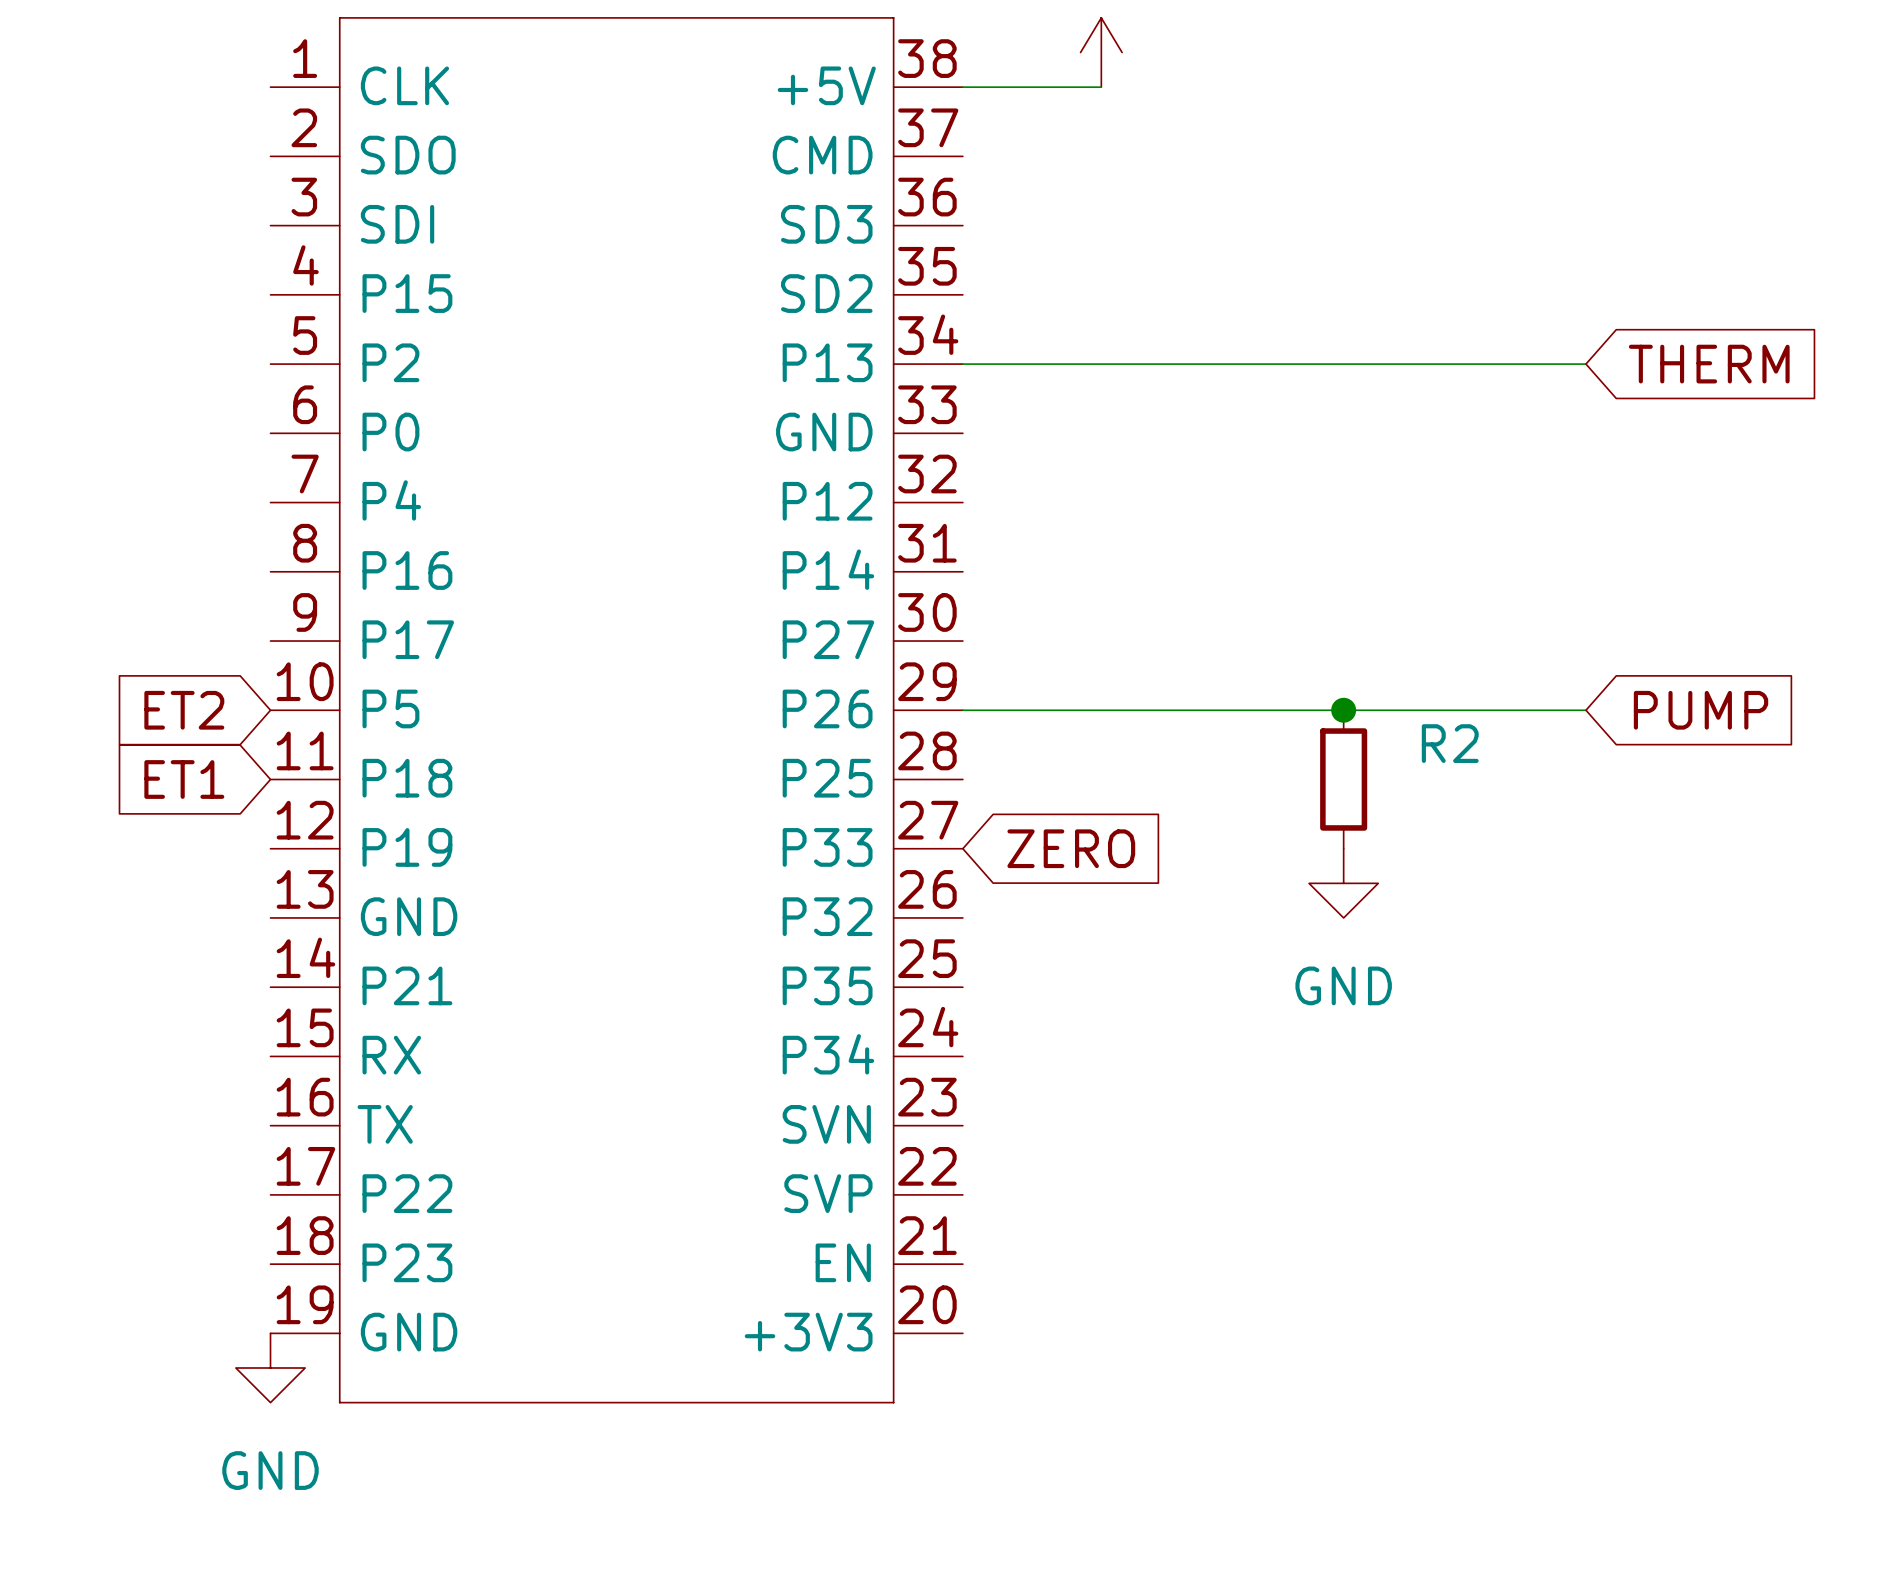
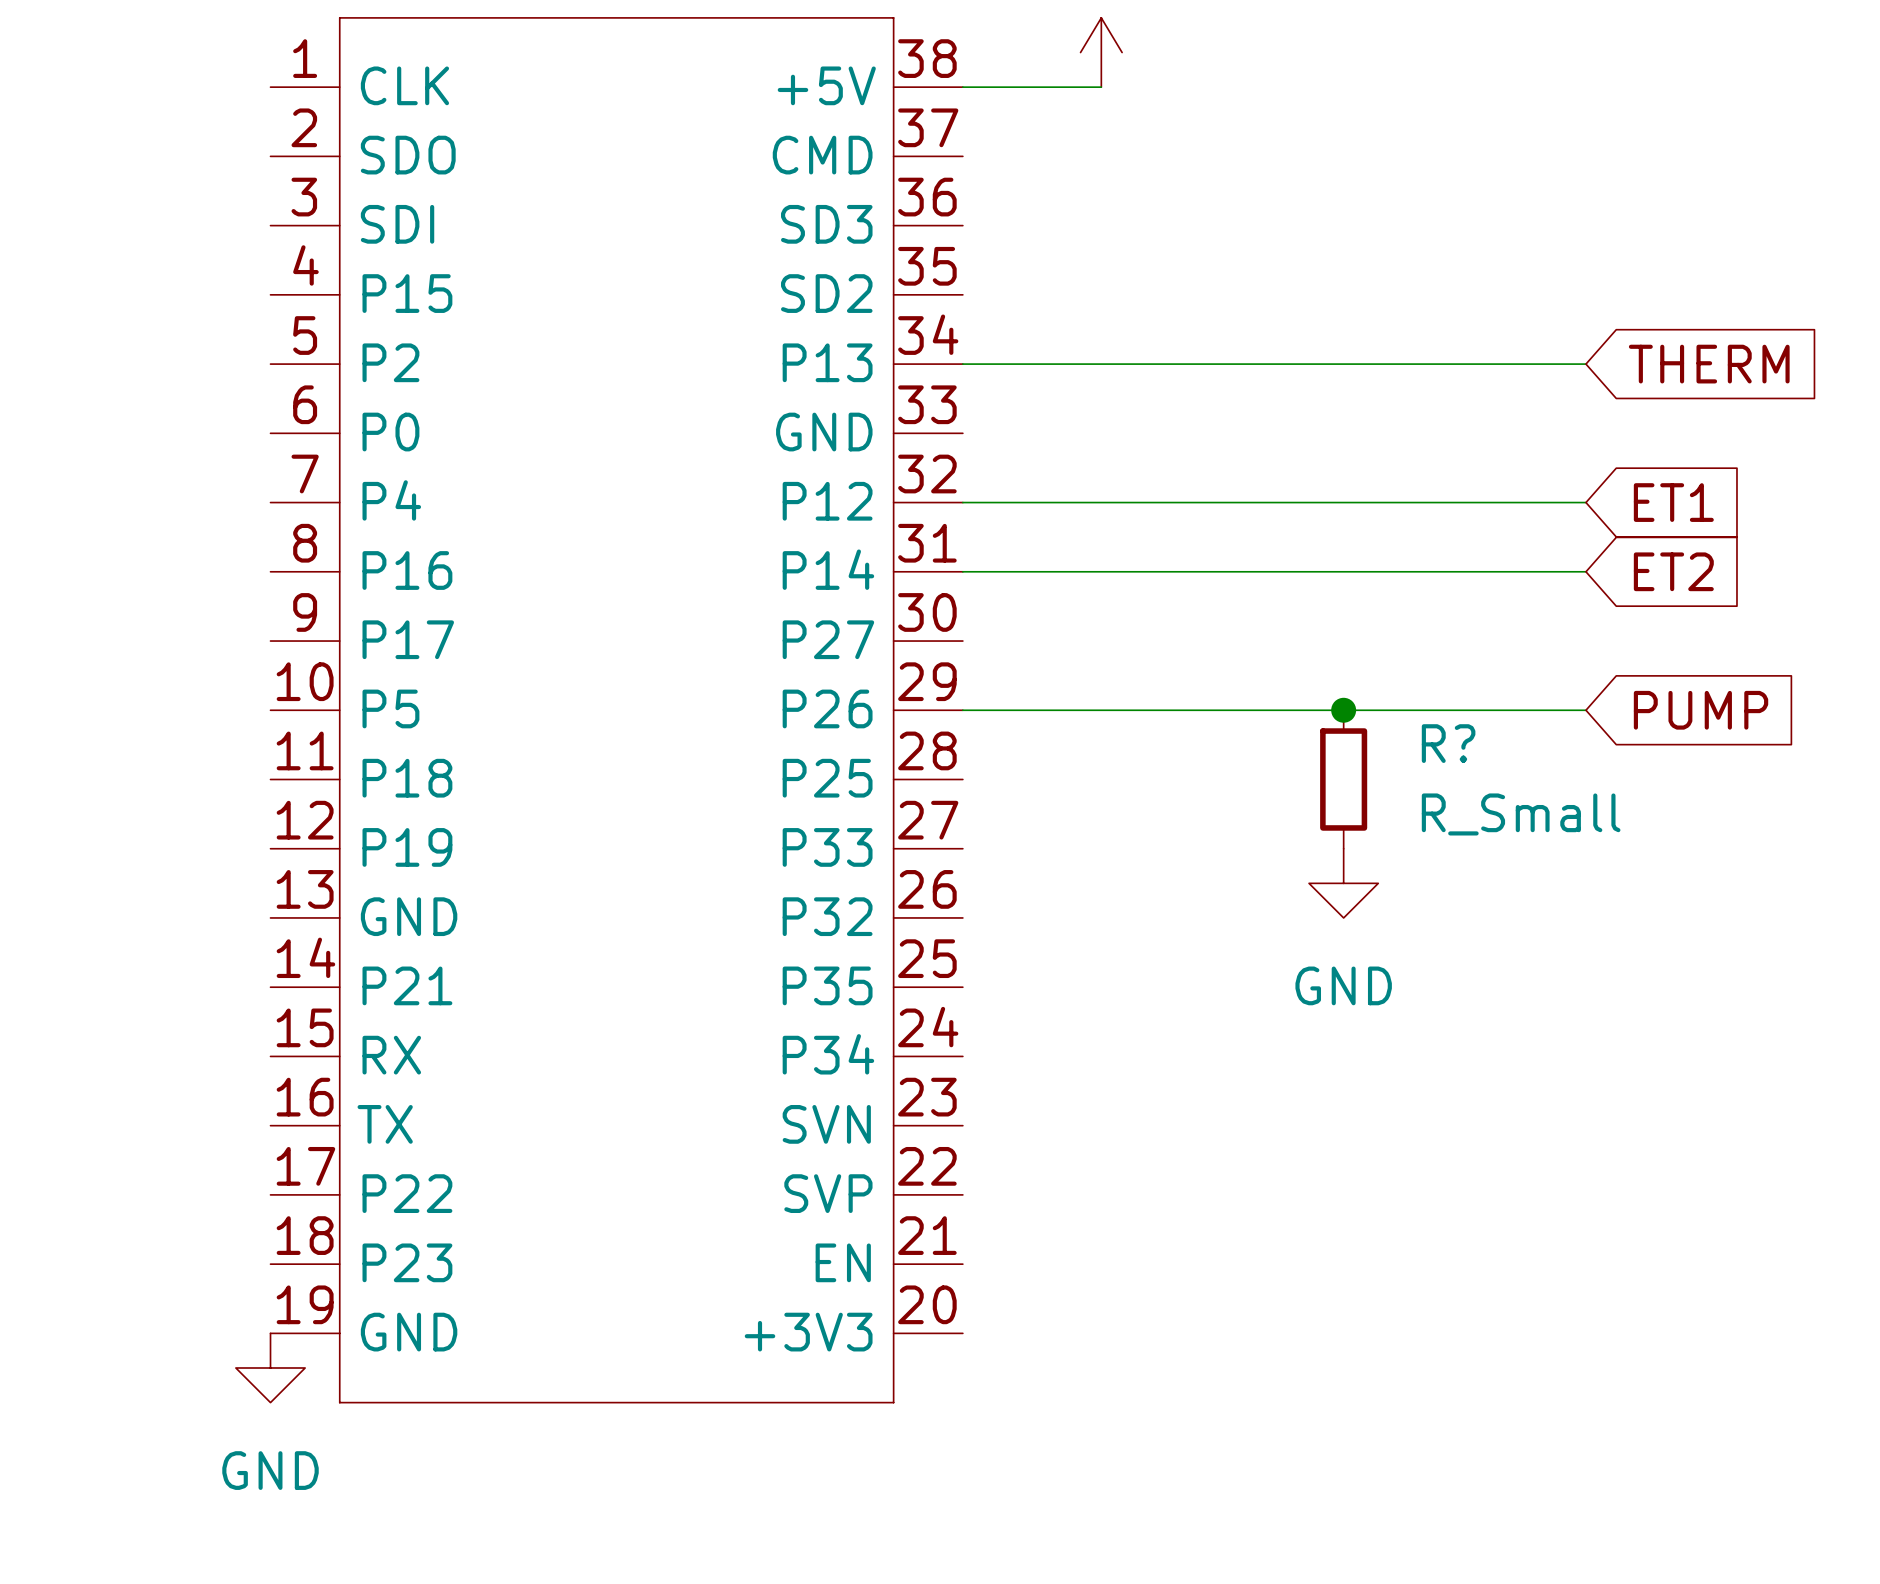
wire: none -> (962, 502) (1585, 502)
global label: none -> ET1 (1673, 502)
wire: none -> (962, 571) (1585, 571)
global label: none -> ET2 (1673, 571)
global label: ET2 (184, 710) -> none
R2 name: R2 (1450, 743) -> R? (1448, 743)
global label: ET1 (184, 779) -> none
R2 value: none -> R_Small (1521, 814)
global label: ZERO (1071, 848) -> none

